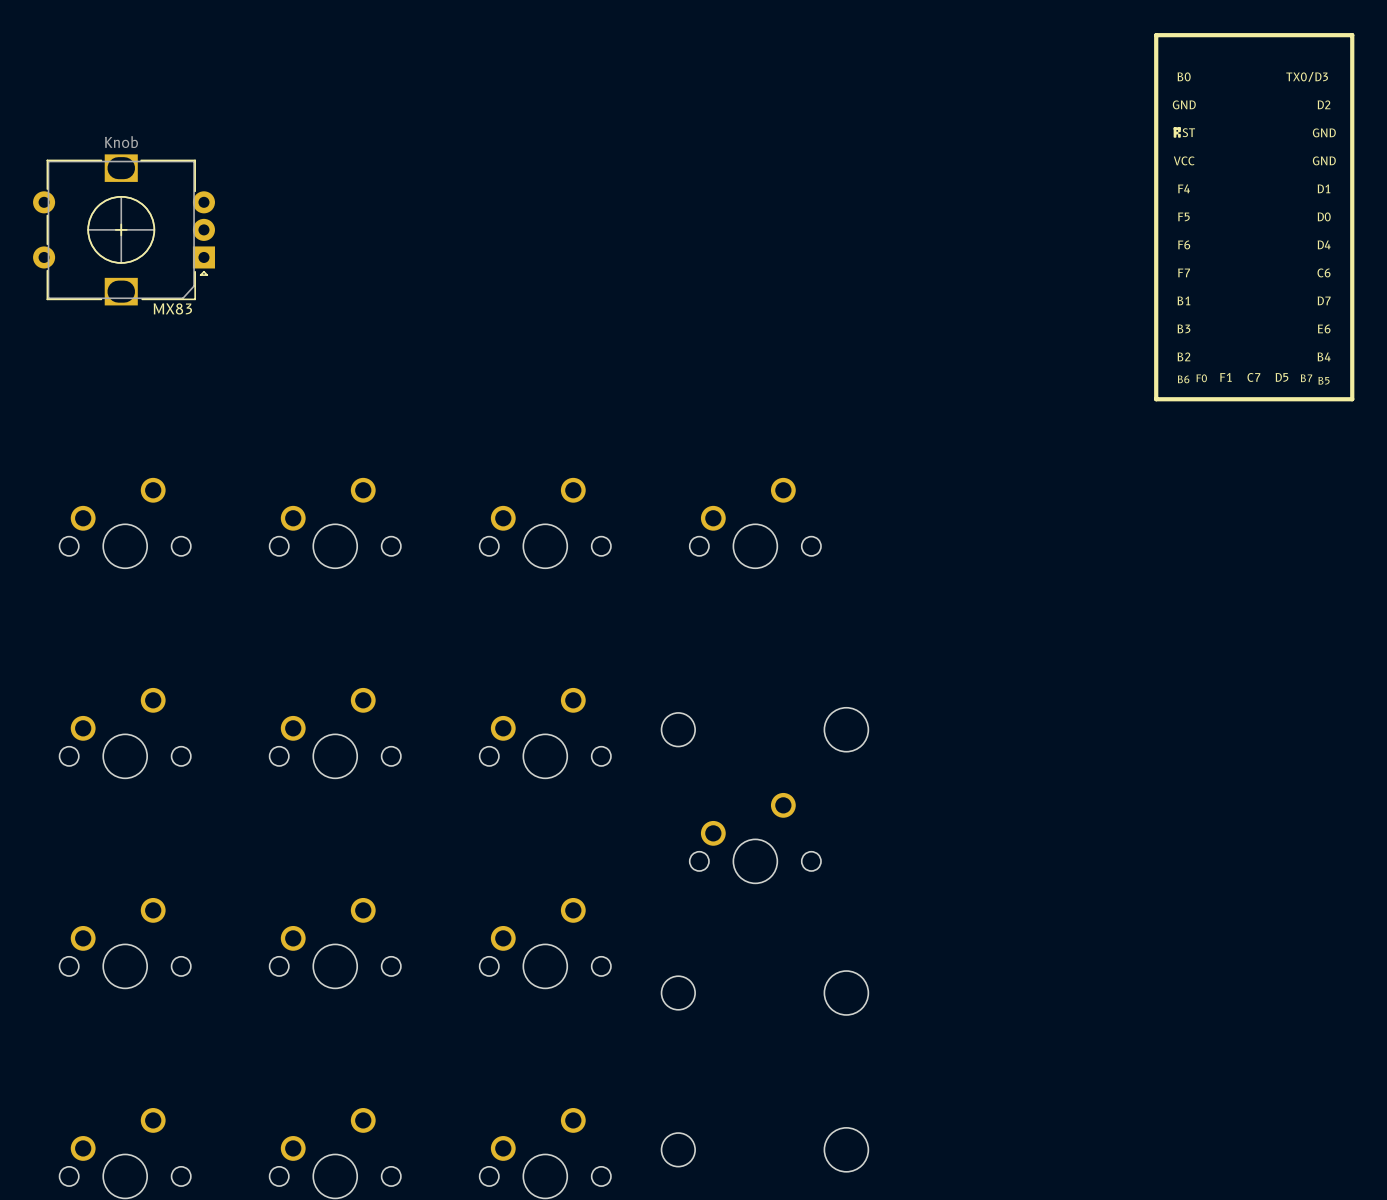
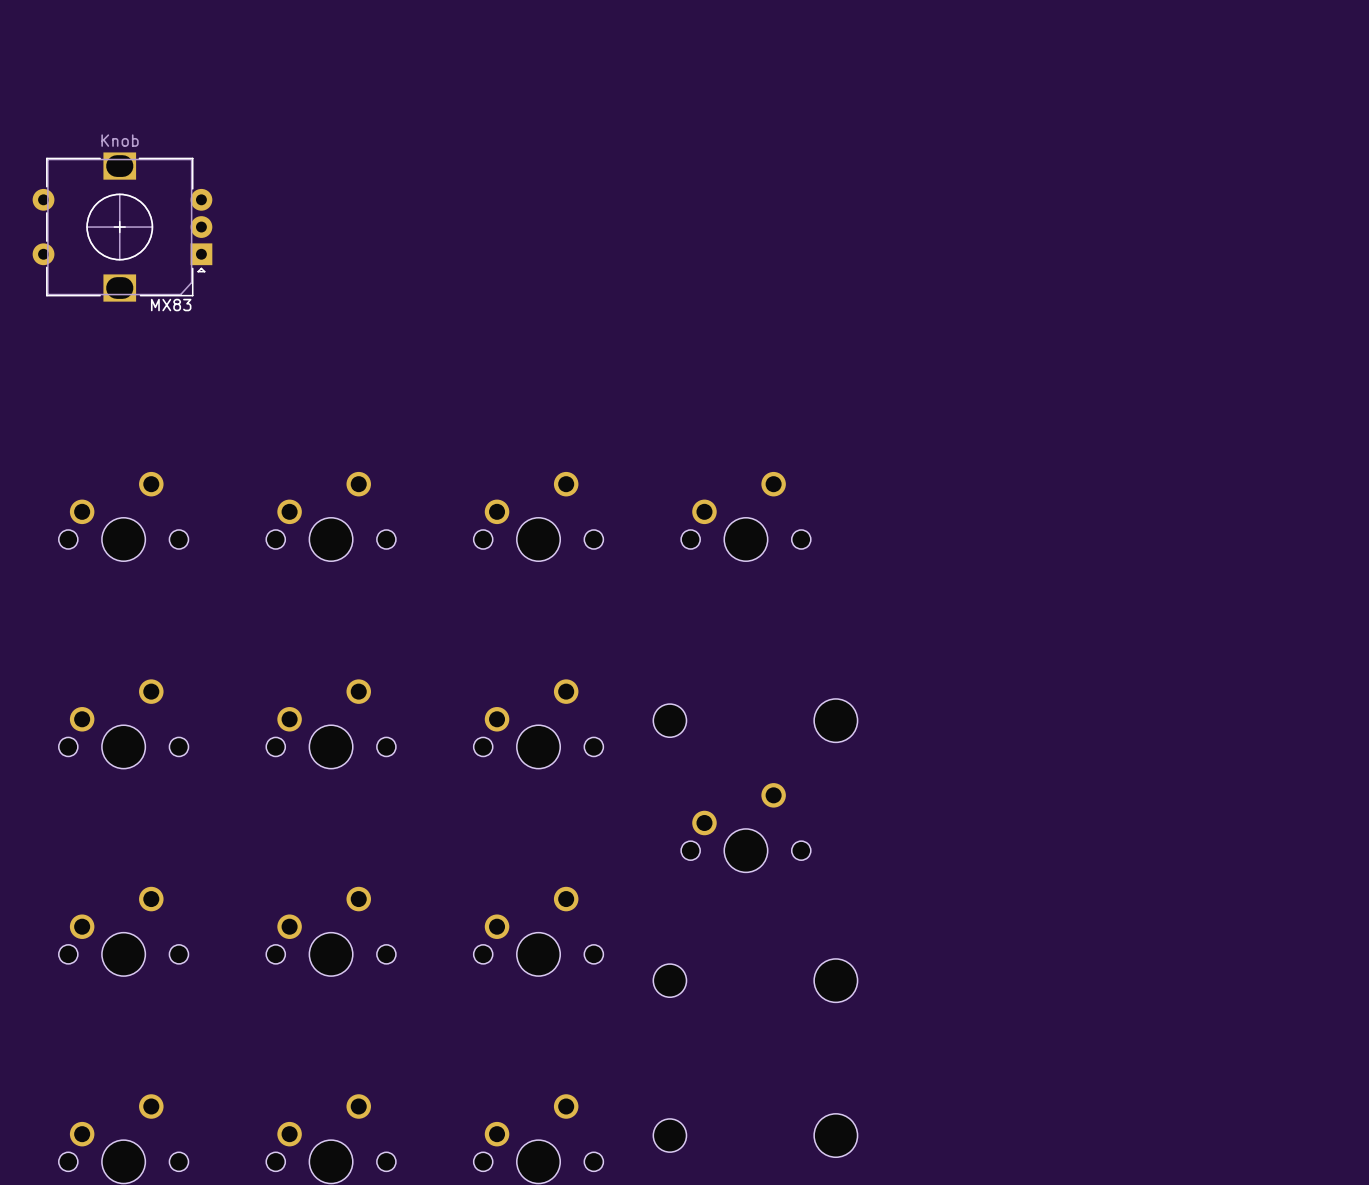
part: (1254, 217) -> none

